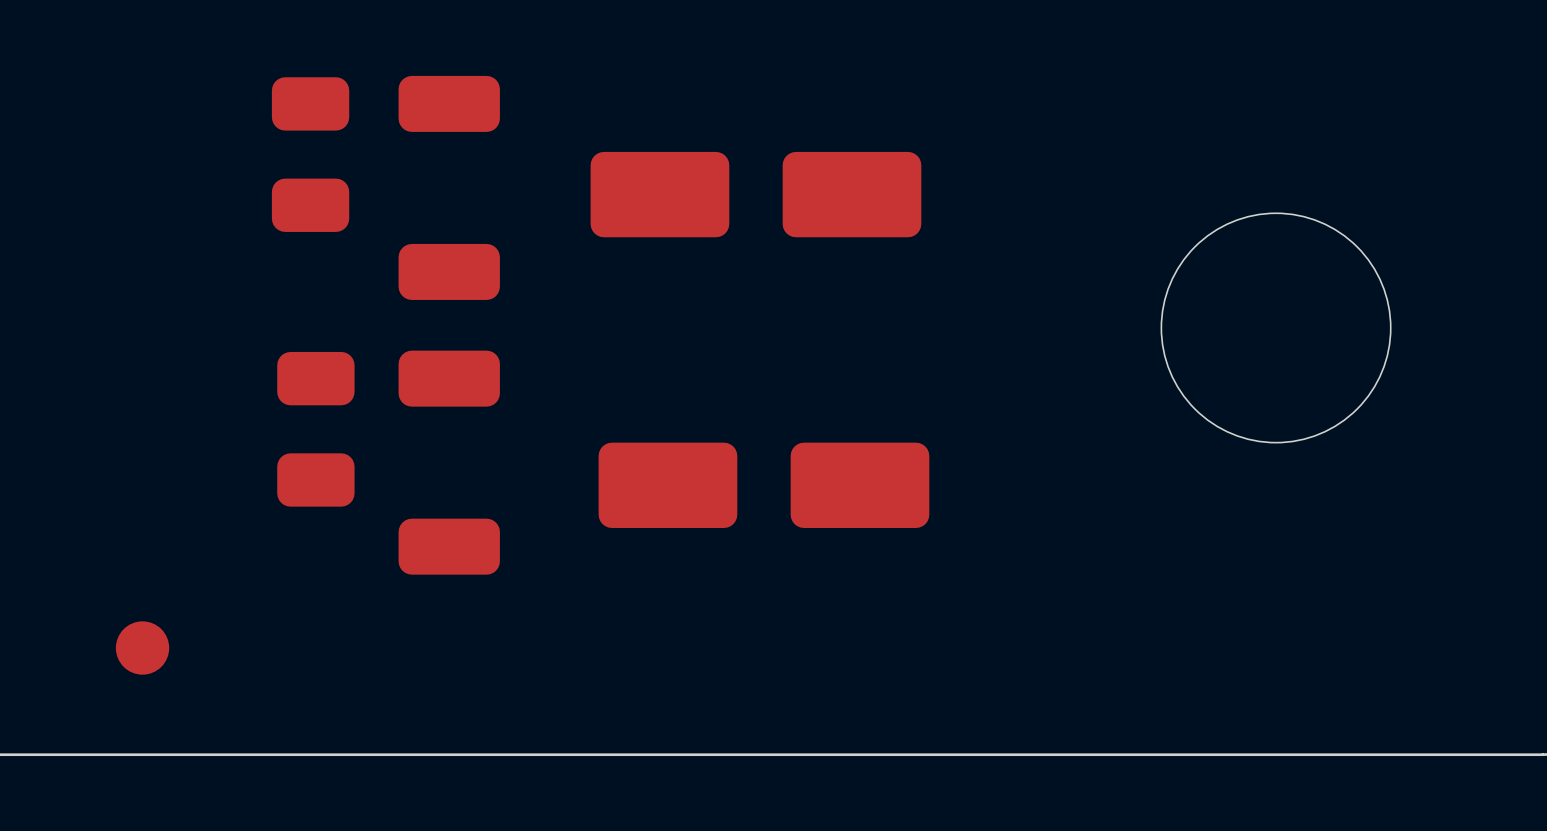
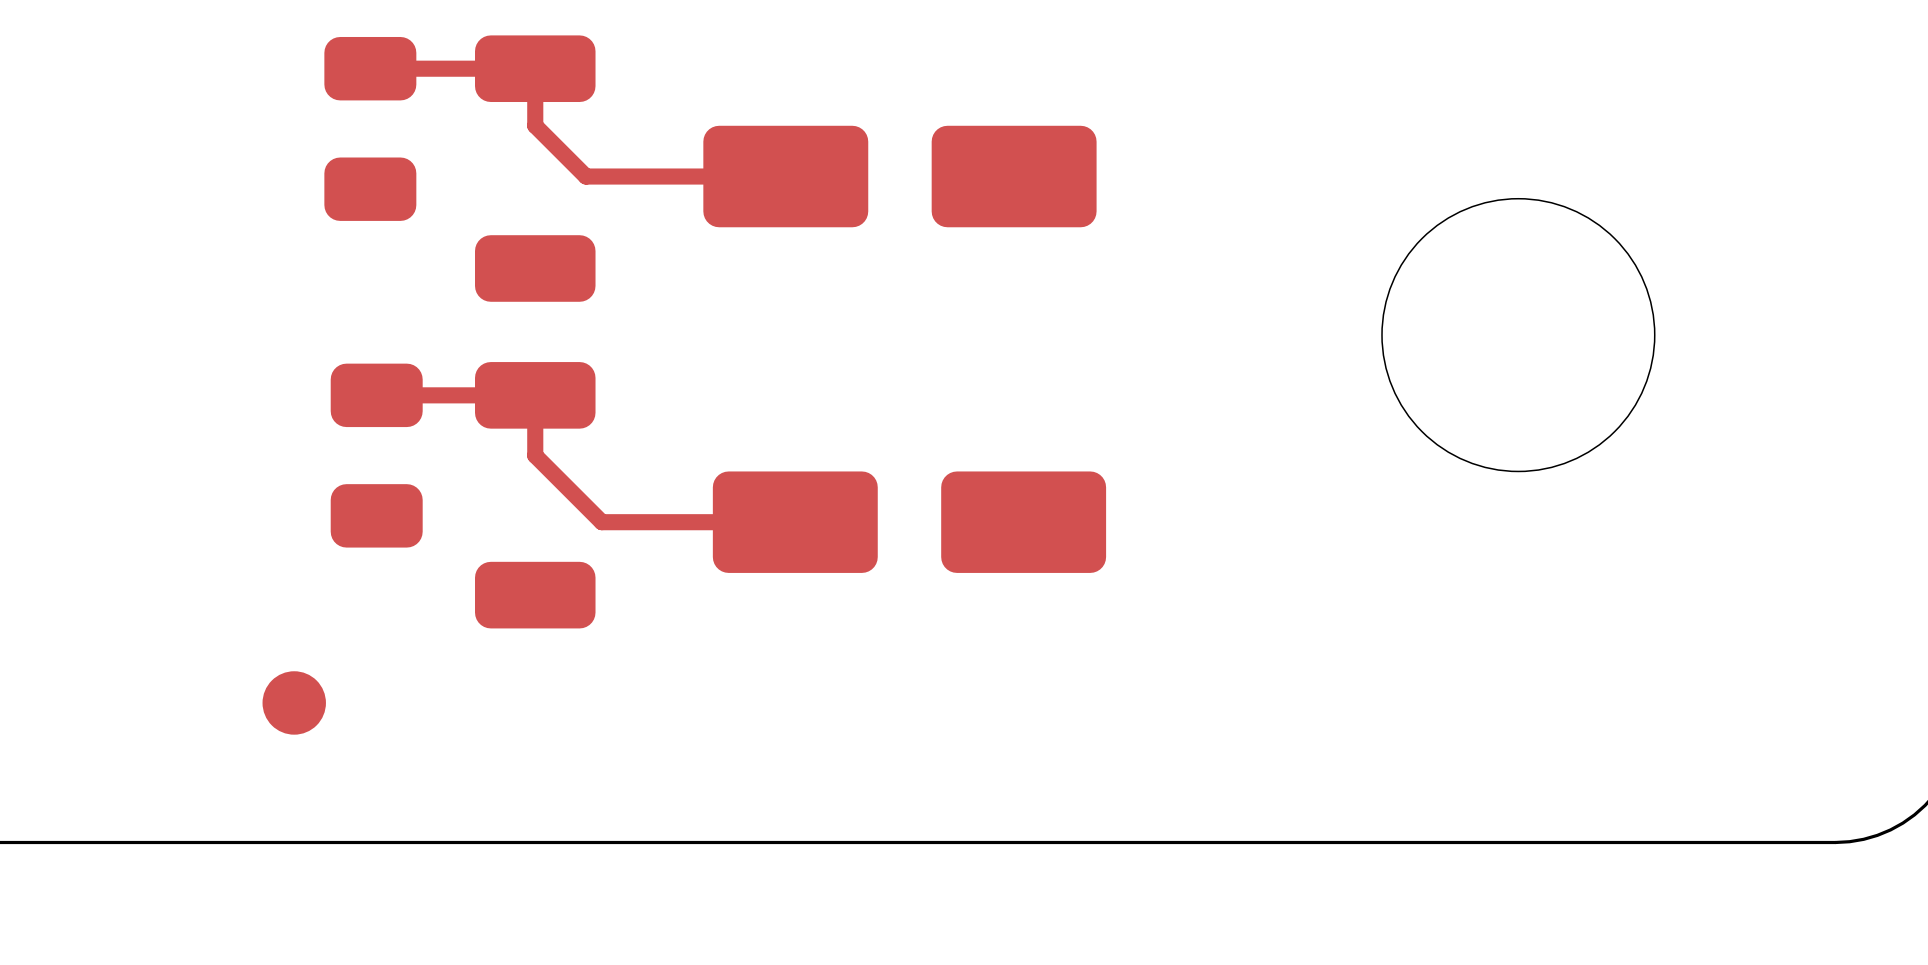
top track: none -> (370, 68) (535, 68) (535, 125) (586, 176) (785, 176)
top track: none -> (376, 395) (535, 395) (535, 455) (601, 522) (795, 522)
part position: (142, 648) -> (294, 702)

